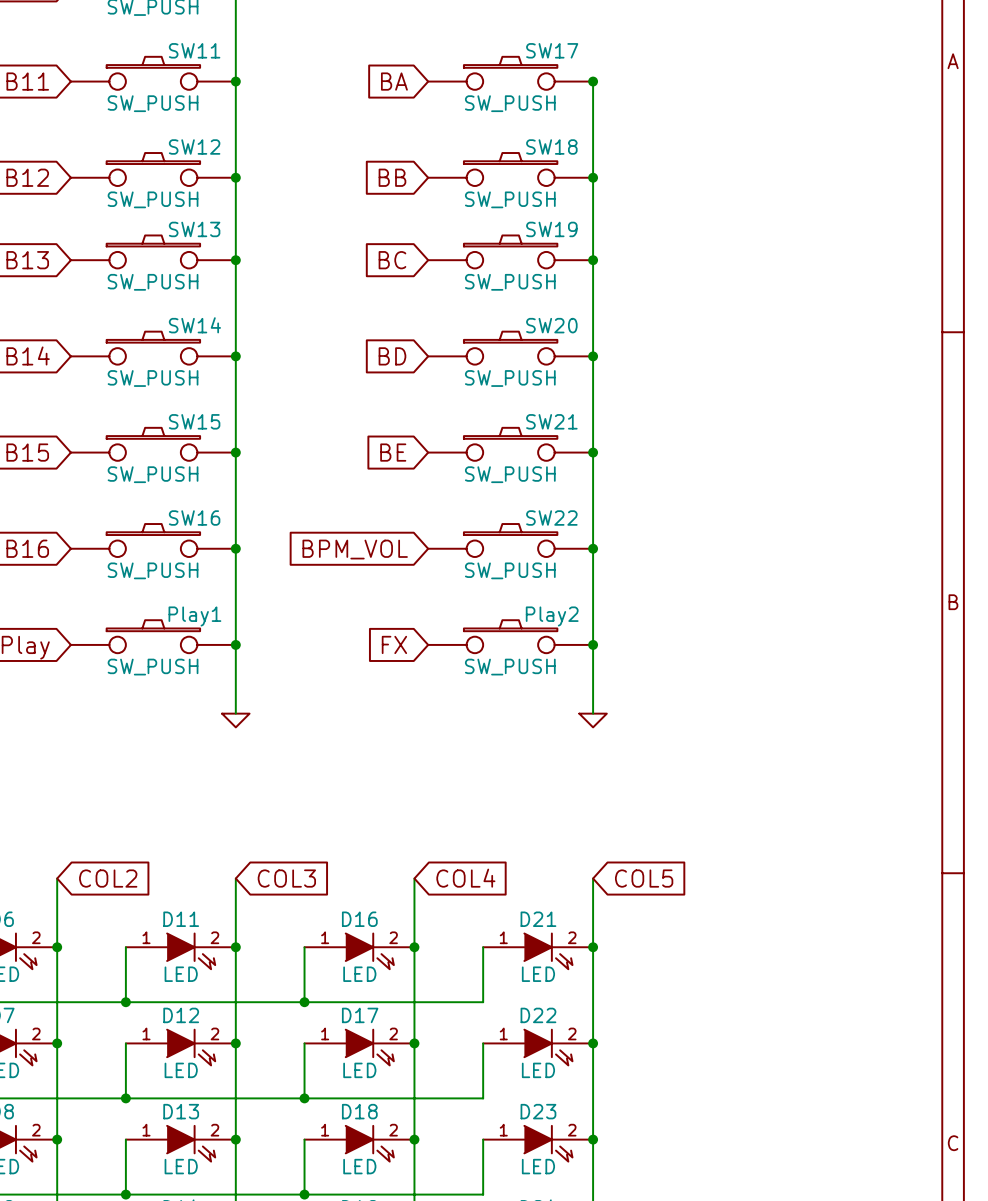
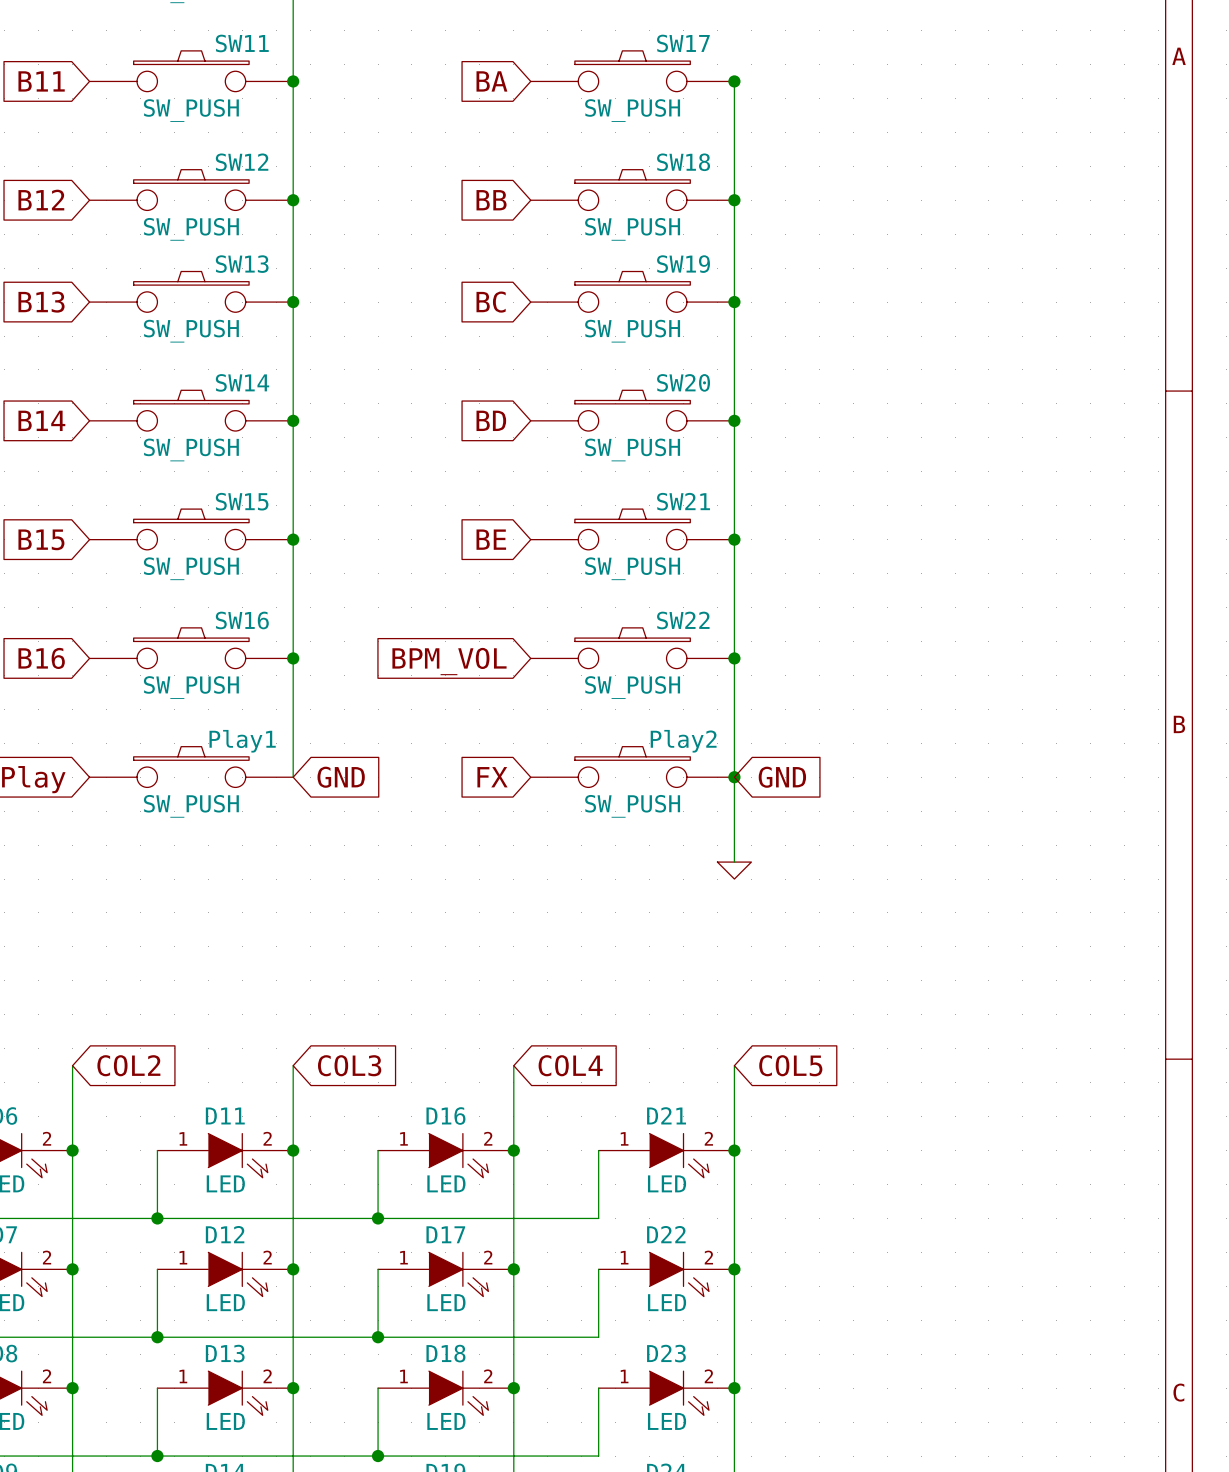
wire: (235, 644) (235, 713) -> none
junction: (235, 644) -> none
global label: none -> GND (341, 777)
global label: none -> GND (782, 777)
power symbol: (235, 720) -> none

